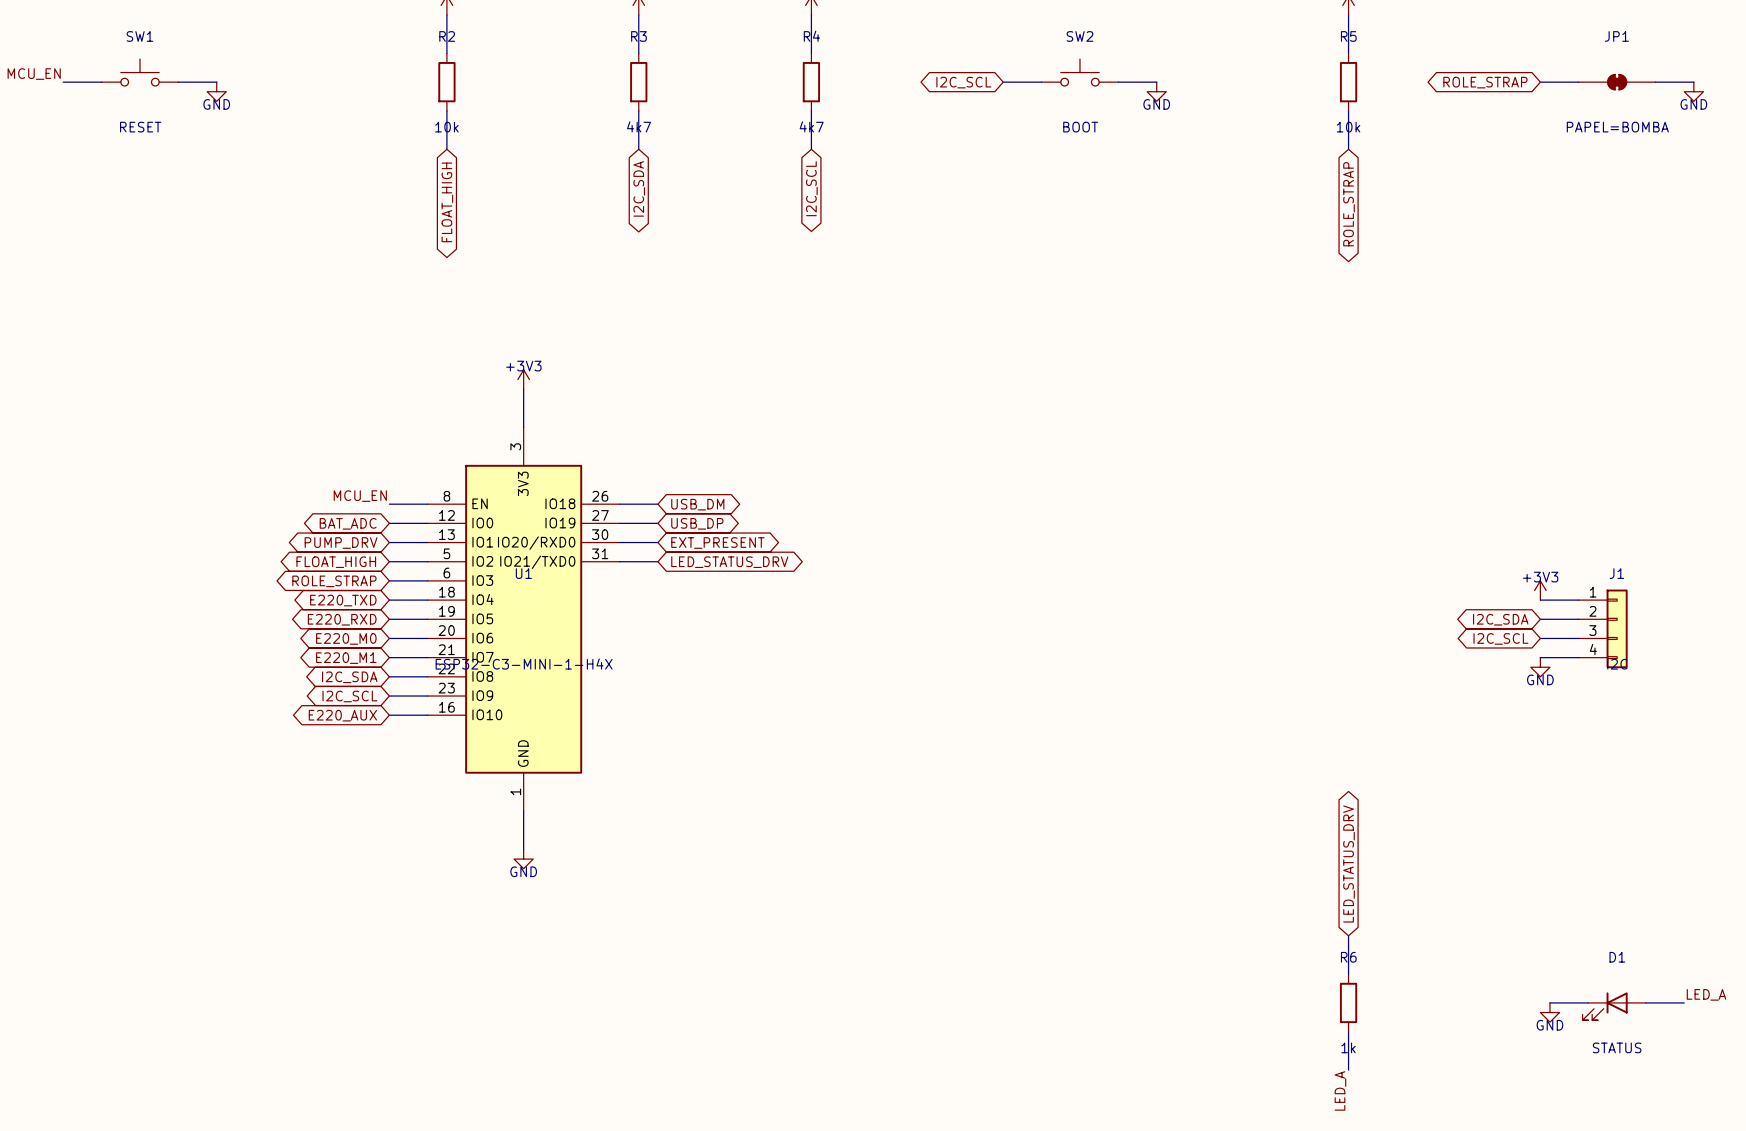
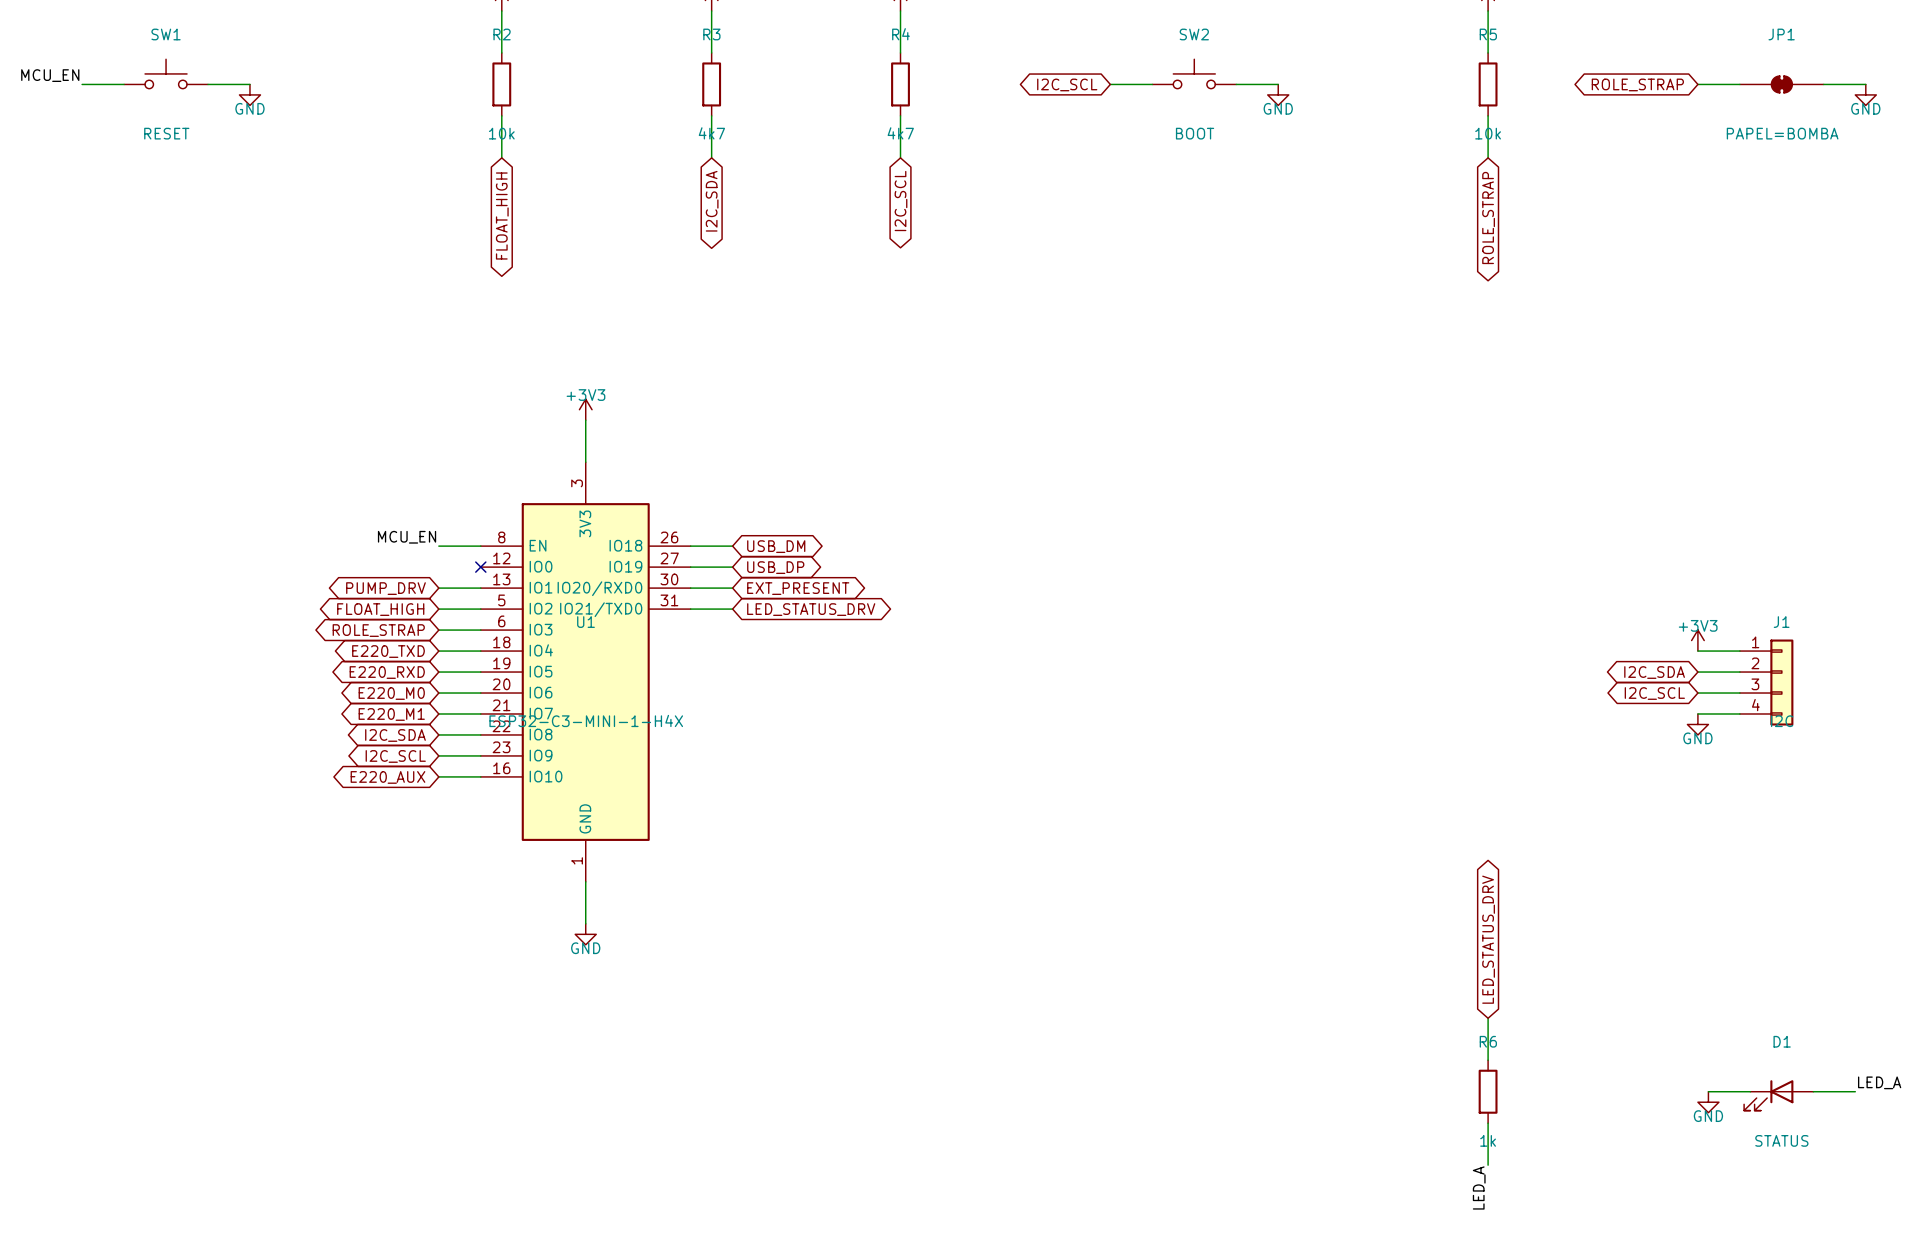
global label: BAT_ADC (348, 523) -> none
wire: (389, 523) (427, 523) -> none
no-connect mark: none -> (480, 567)

